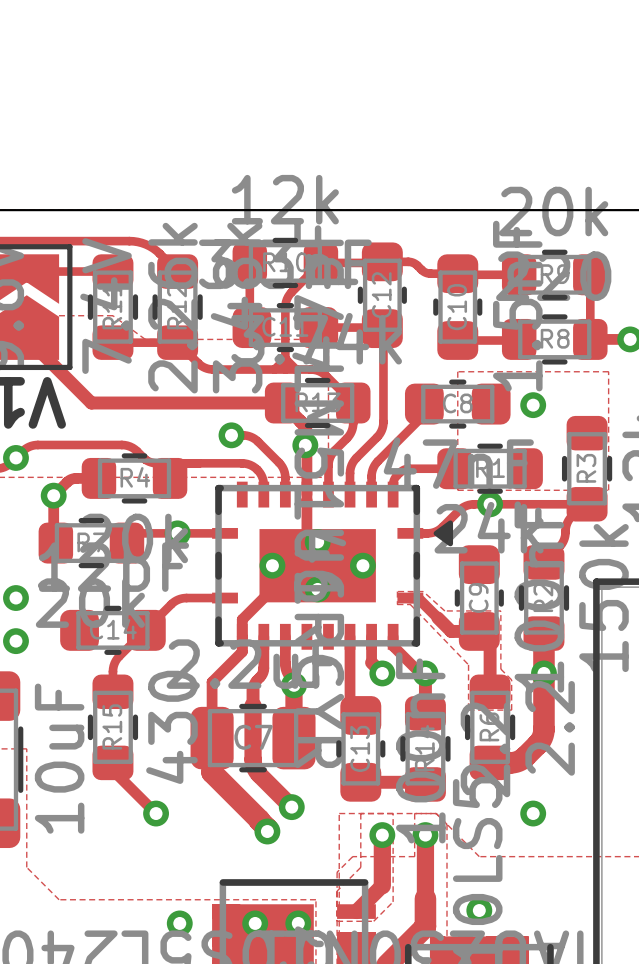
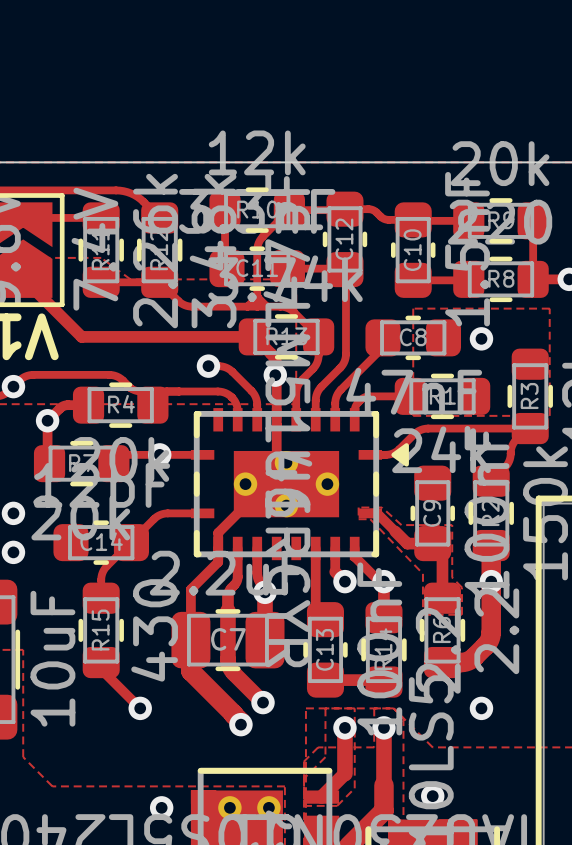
via: (490, 504) -> none

